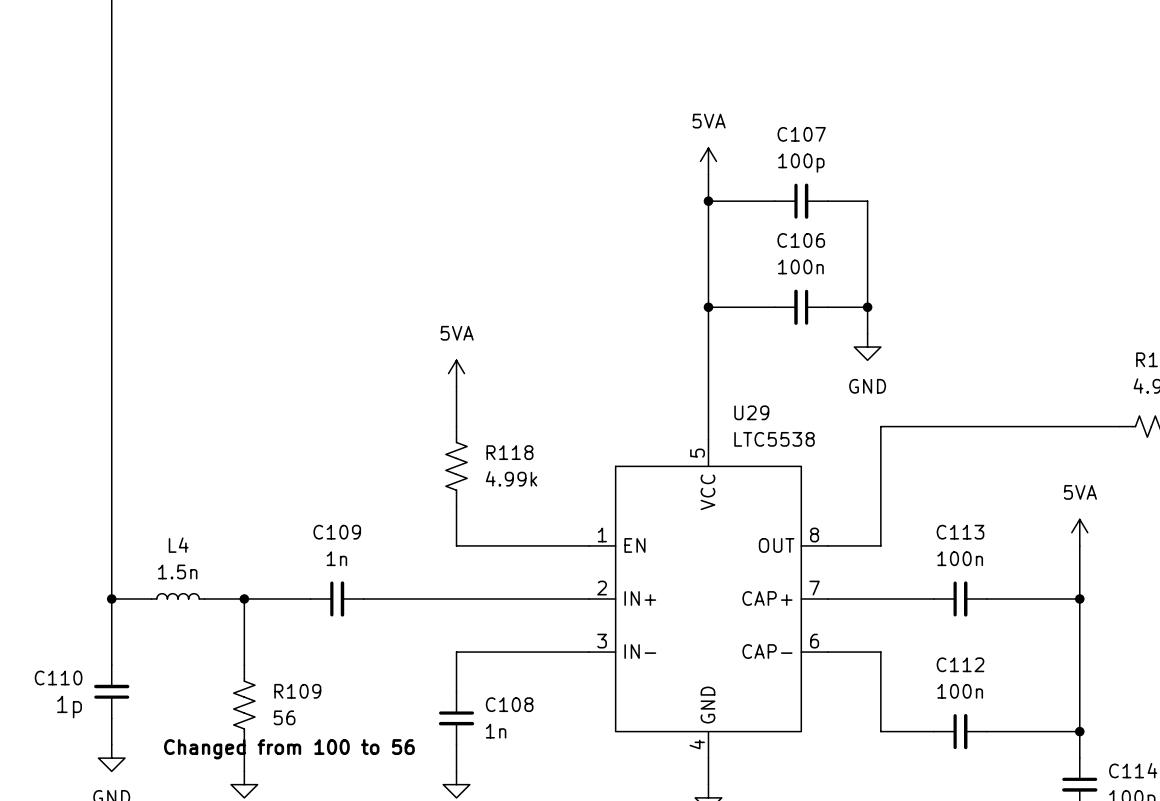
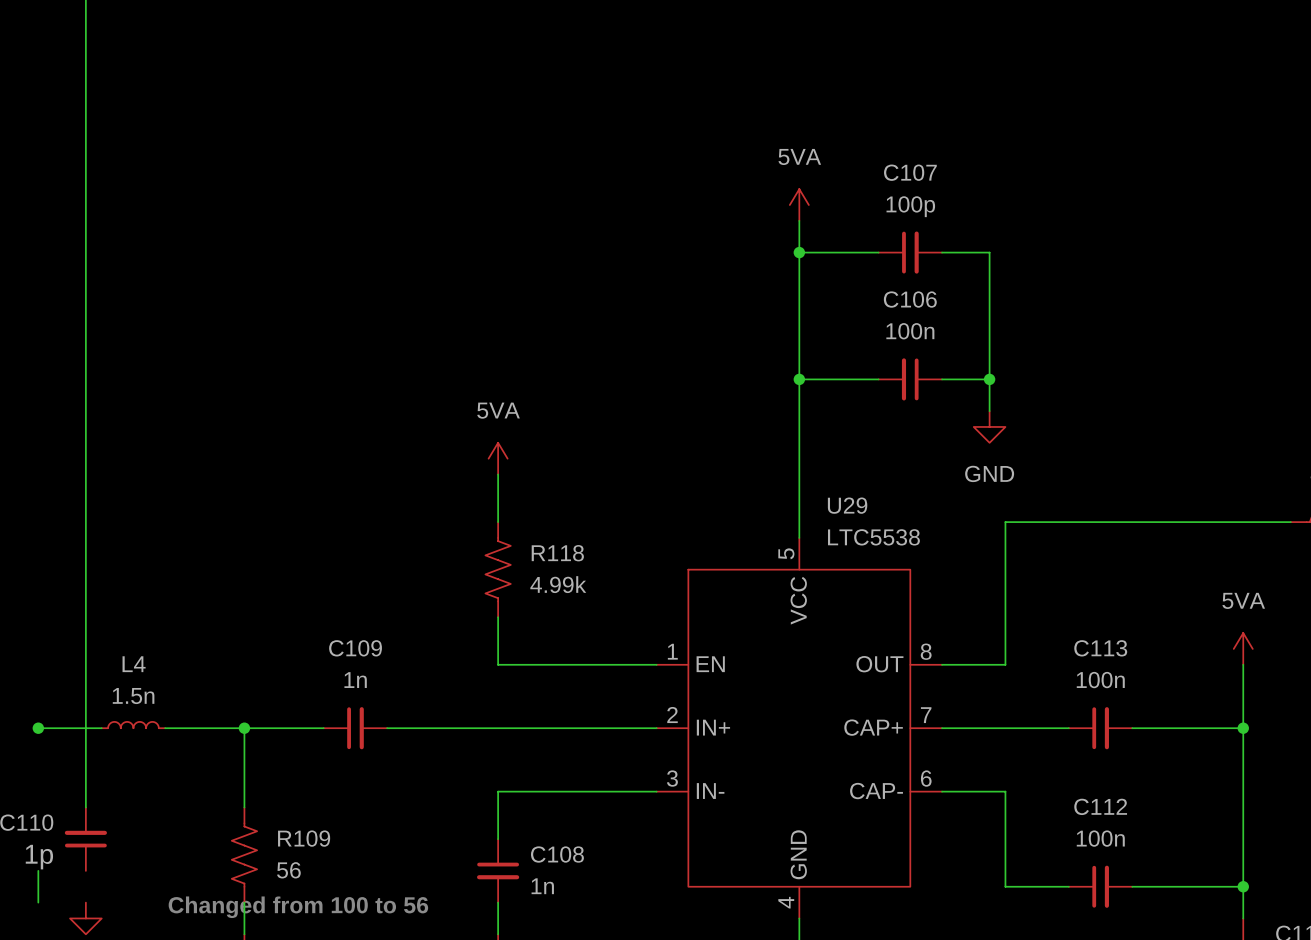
L4 position: (178, 596) -> (133, 725)
wire: none -> (38, 728) (85, 728)
junction position: (111, 598) -> (38, 728)
wire: (124, 598) (151, 598) -> (165, 728) (196, 728)
wire: (111, 718) (111, 744) -> (38, 870) (38, 902)

